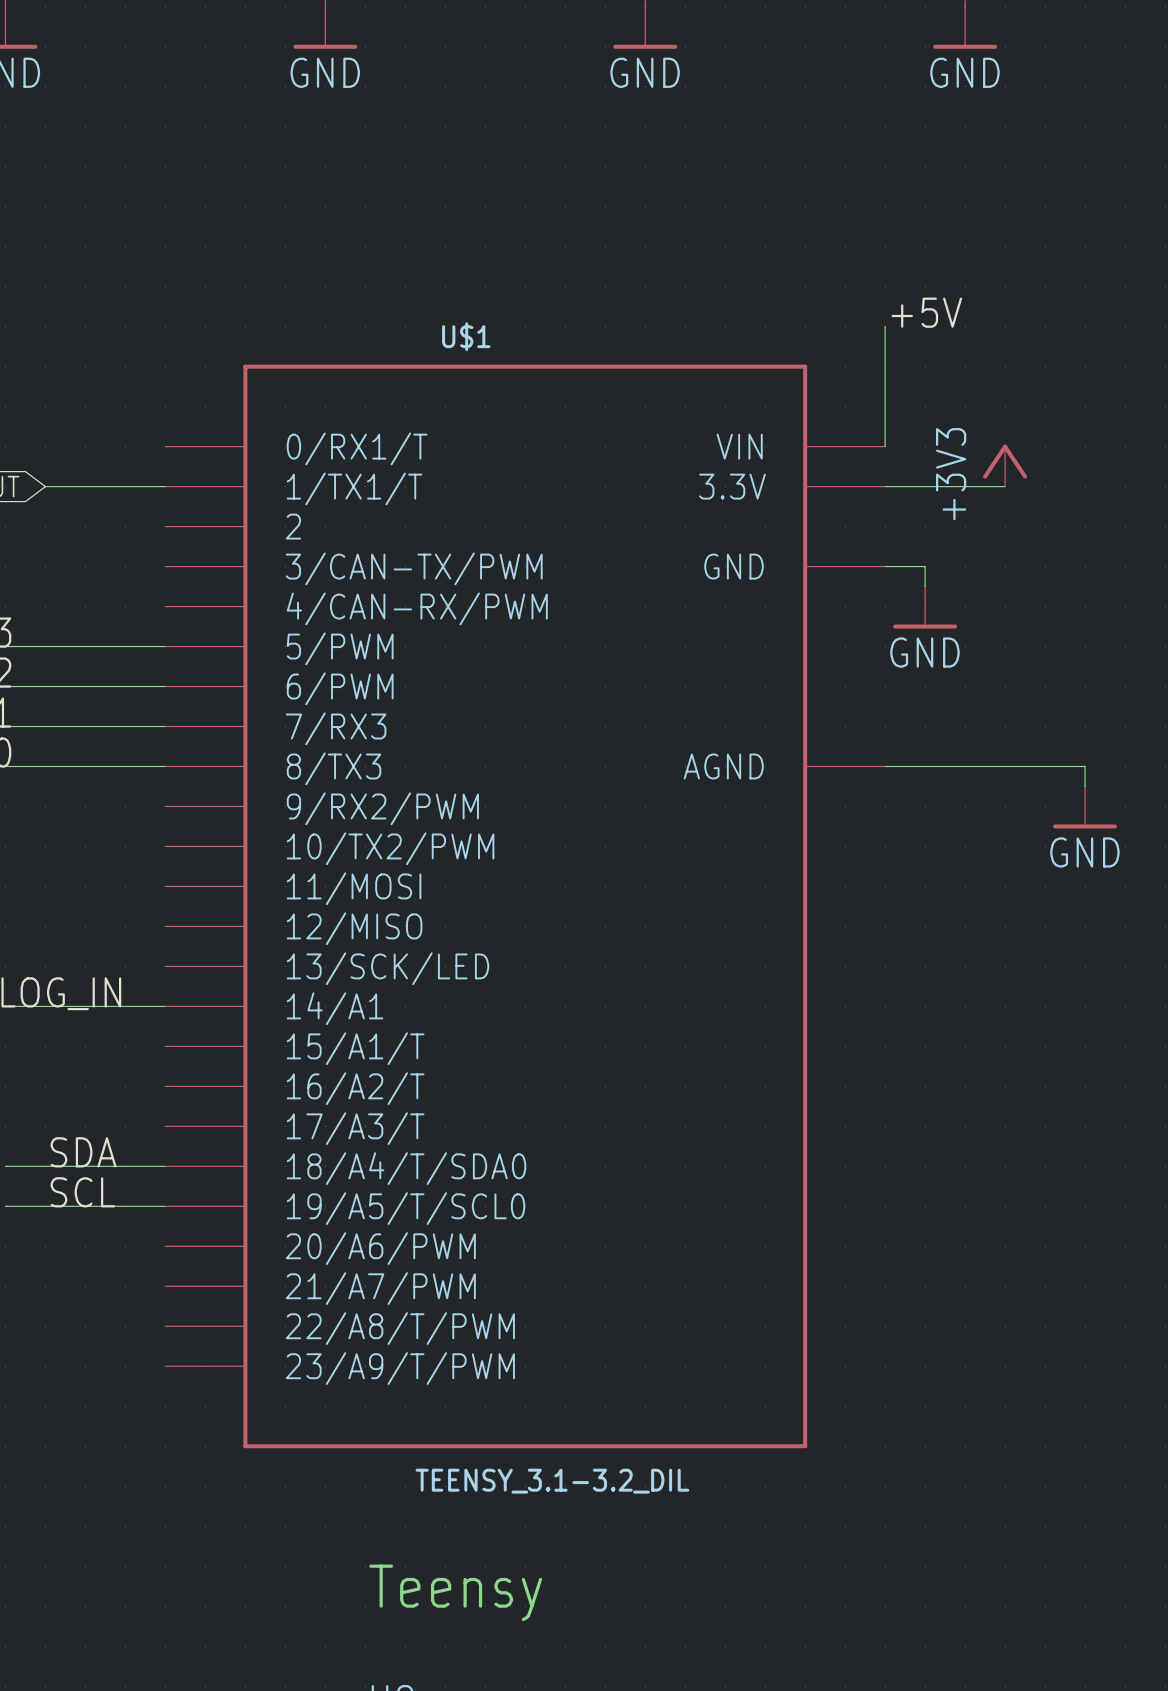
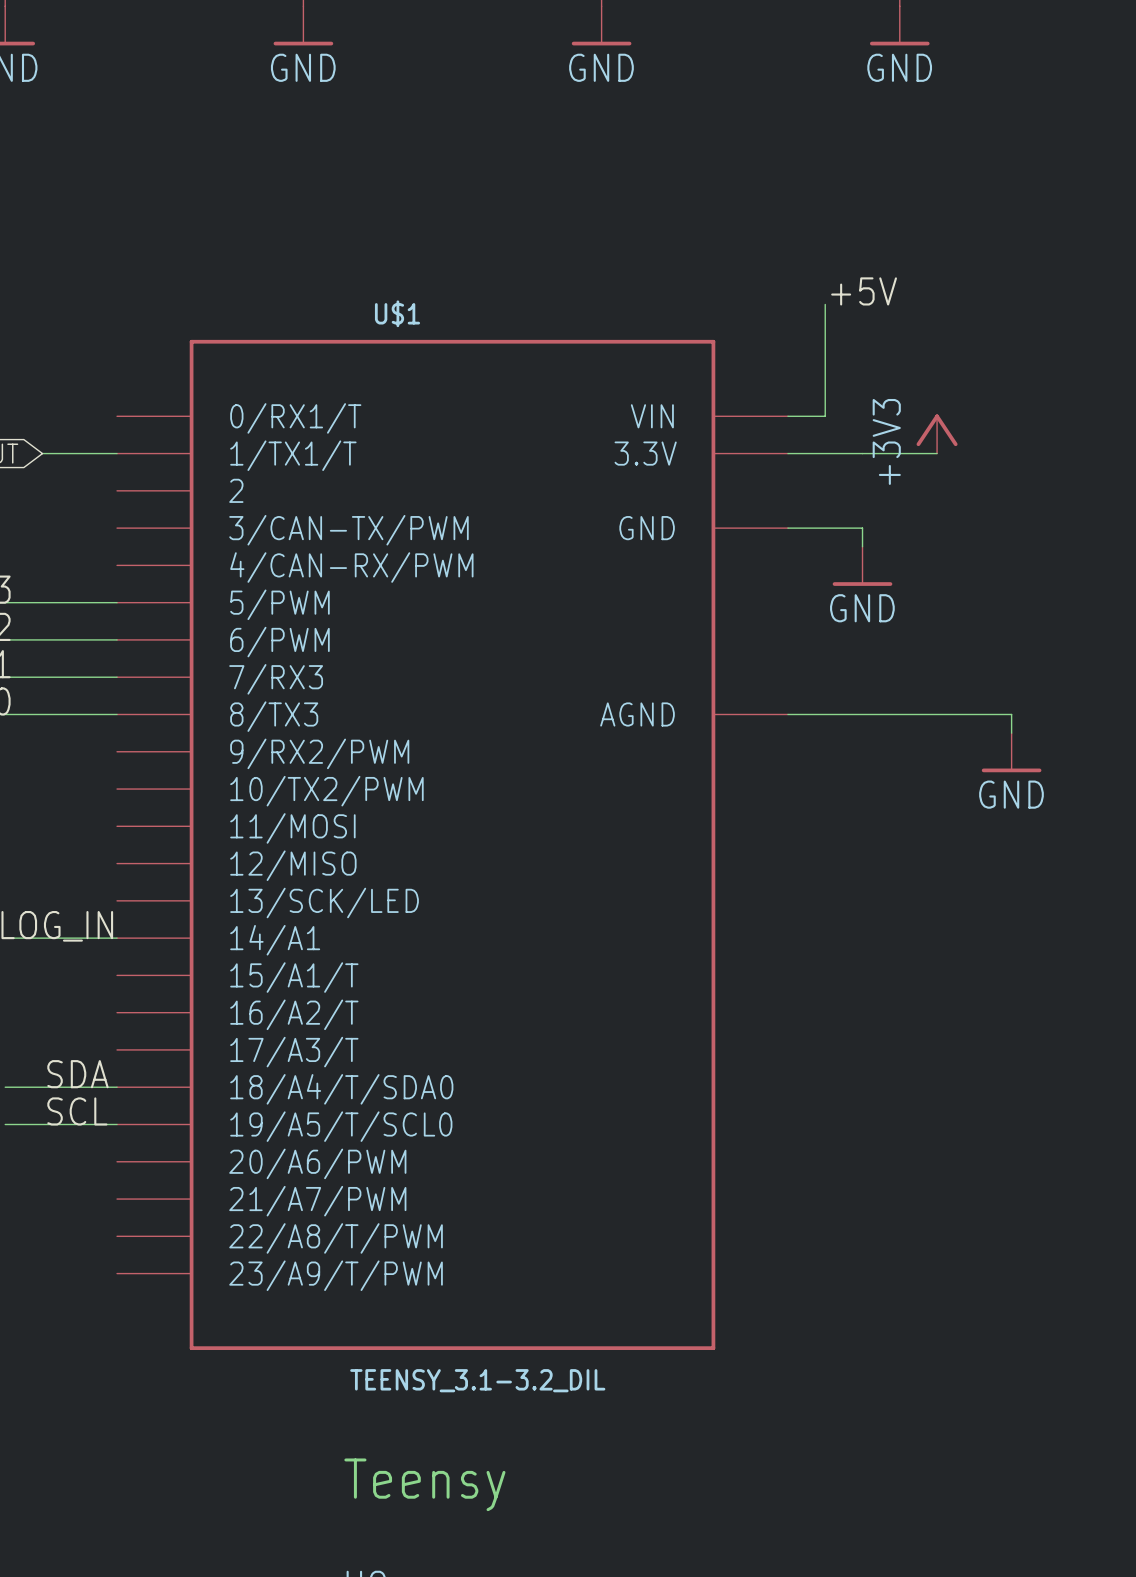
U$1 position: (525, 906) -> (452, 844)

